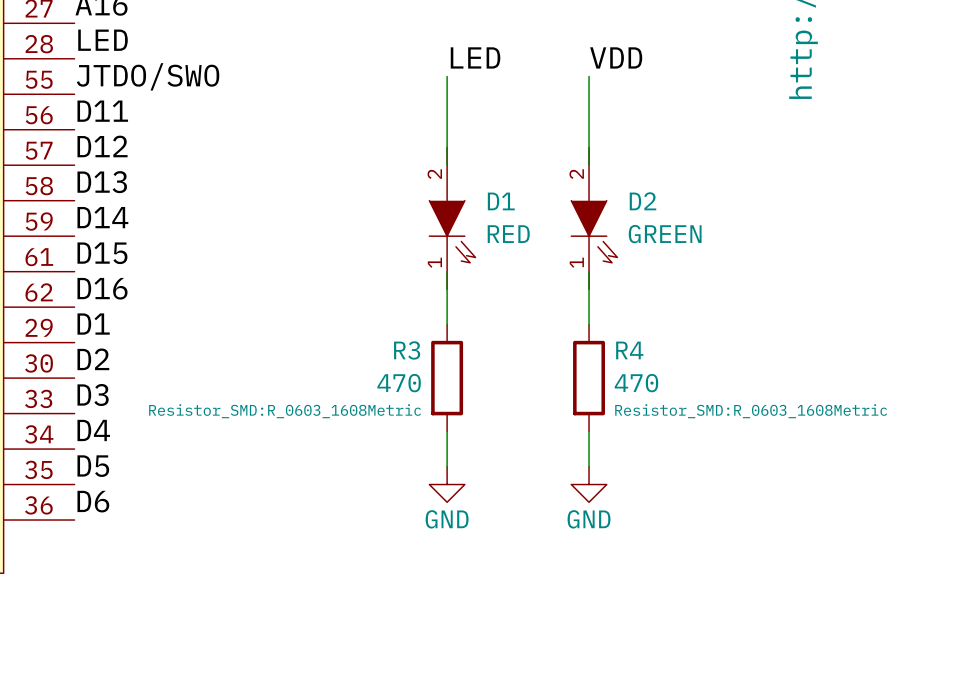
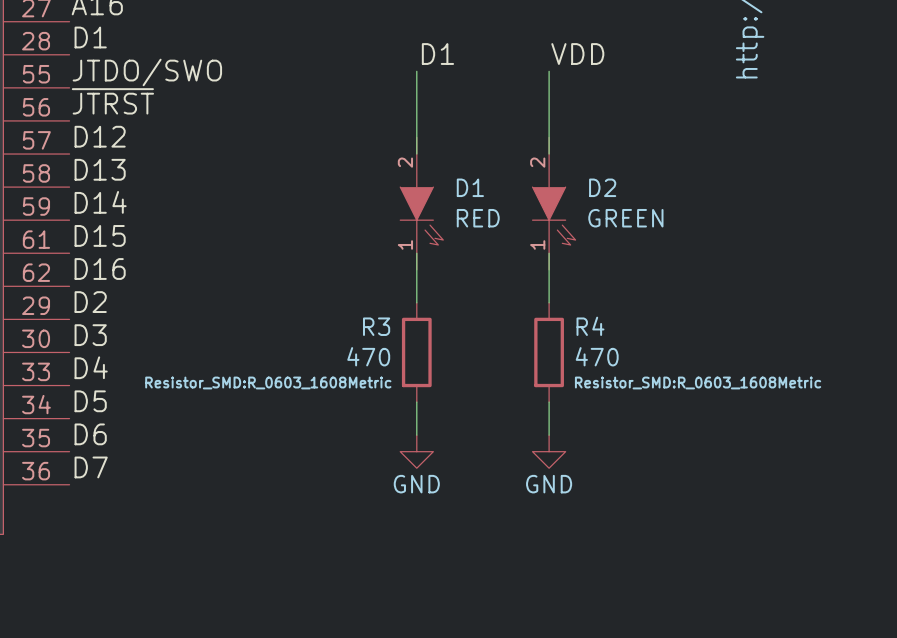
label: LED (103, 40) -> D1 (90, 37)
label: LED (475, 57) -> D1 (437, 54)
label: D11 (102, 111) -> ~{JTRST} (112, 101)
label: D1 (93, 324) -> D2 (90, 302)
label: D2 (93, 359) -> D3 (90, 335)
label: D3 (93, 395) -> D4 (91, 367)
label: D4 (93, 430) -> D5 (90, 401)
label: D5 (93, 466) -> D6 (90, 434)
label: D6 (93, 501) -> D7 (91, 467)

